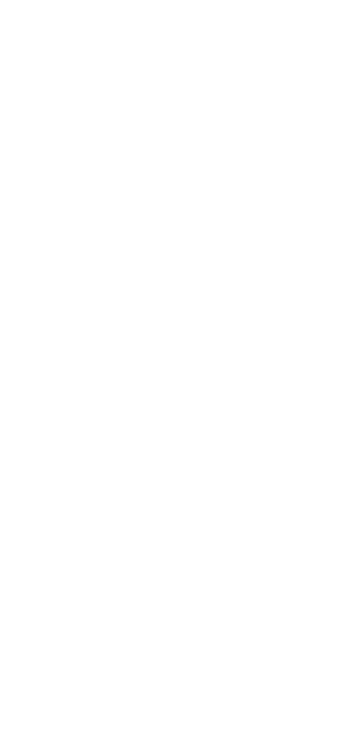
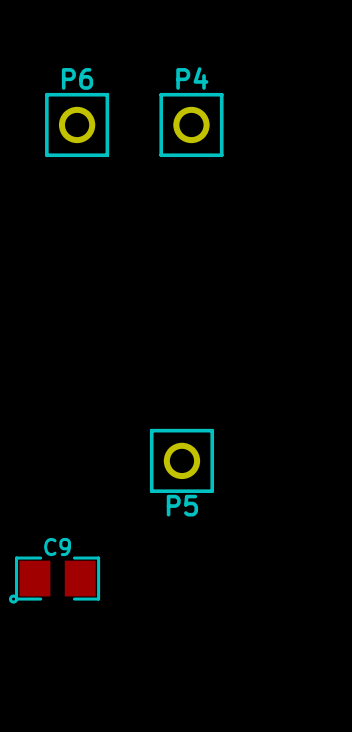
P6: none -> (77, 124)
P4: none -> (191, 124)
P5: none -> (181, 460)
C9: none -> (54, 580)

